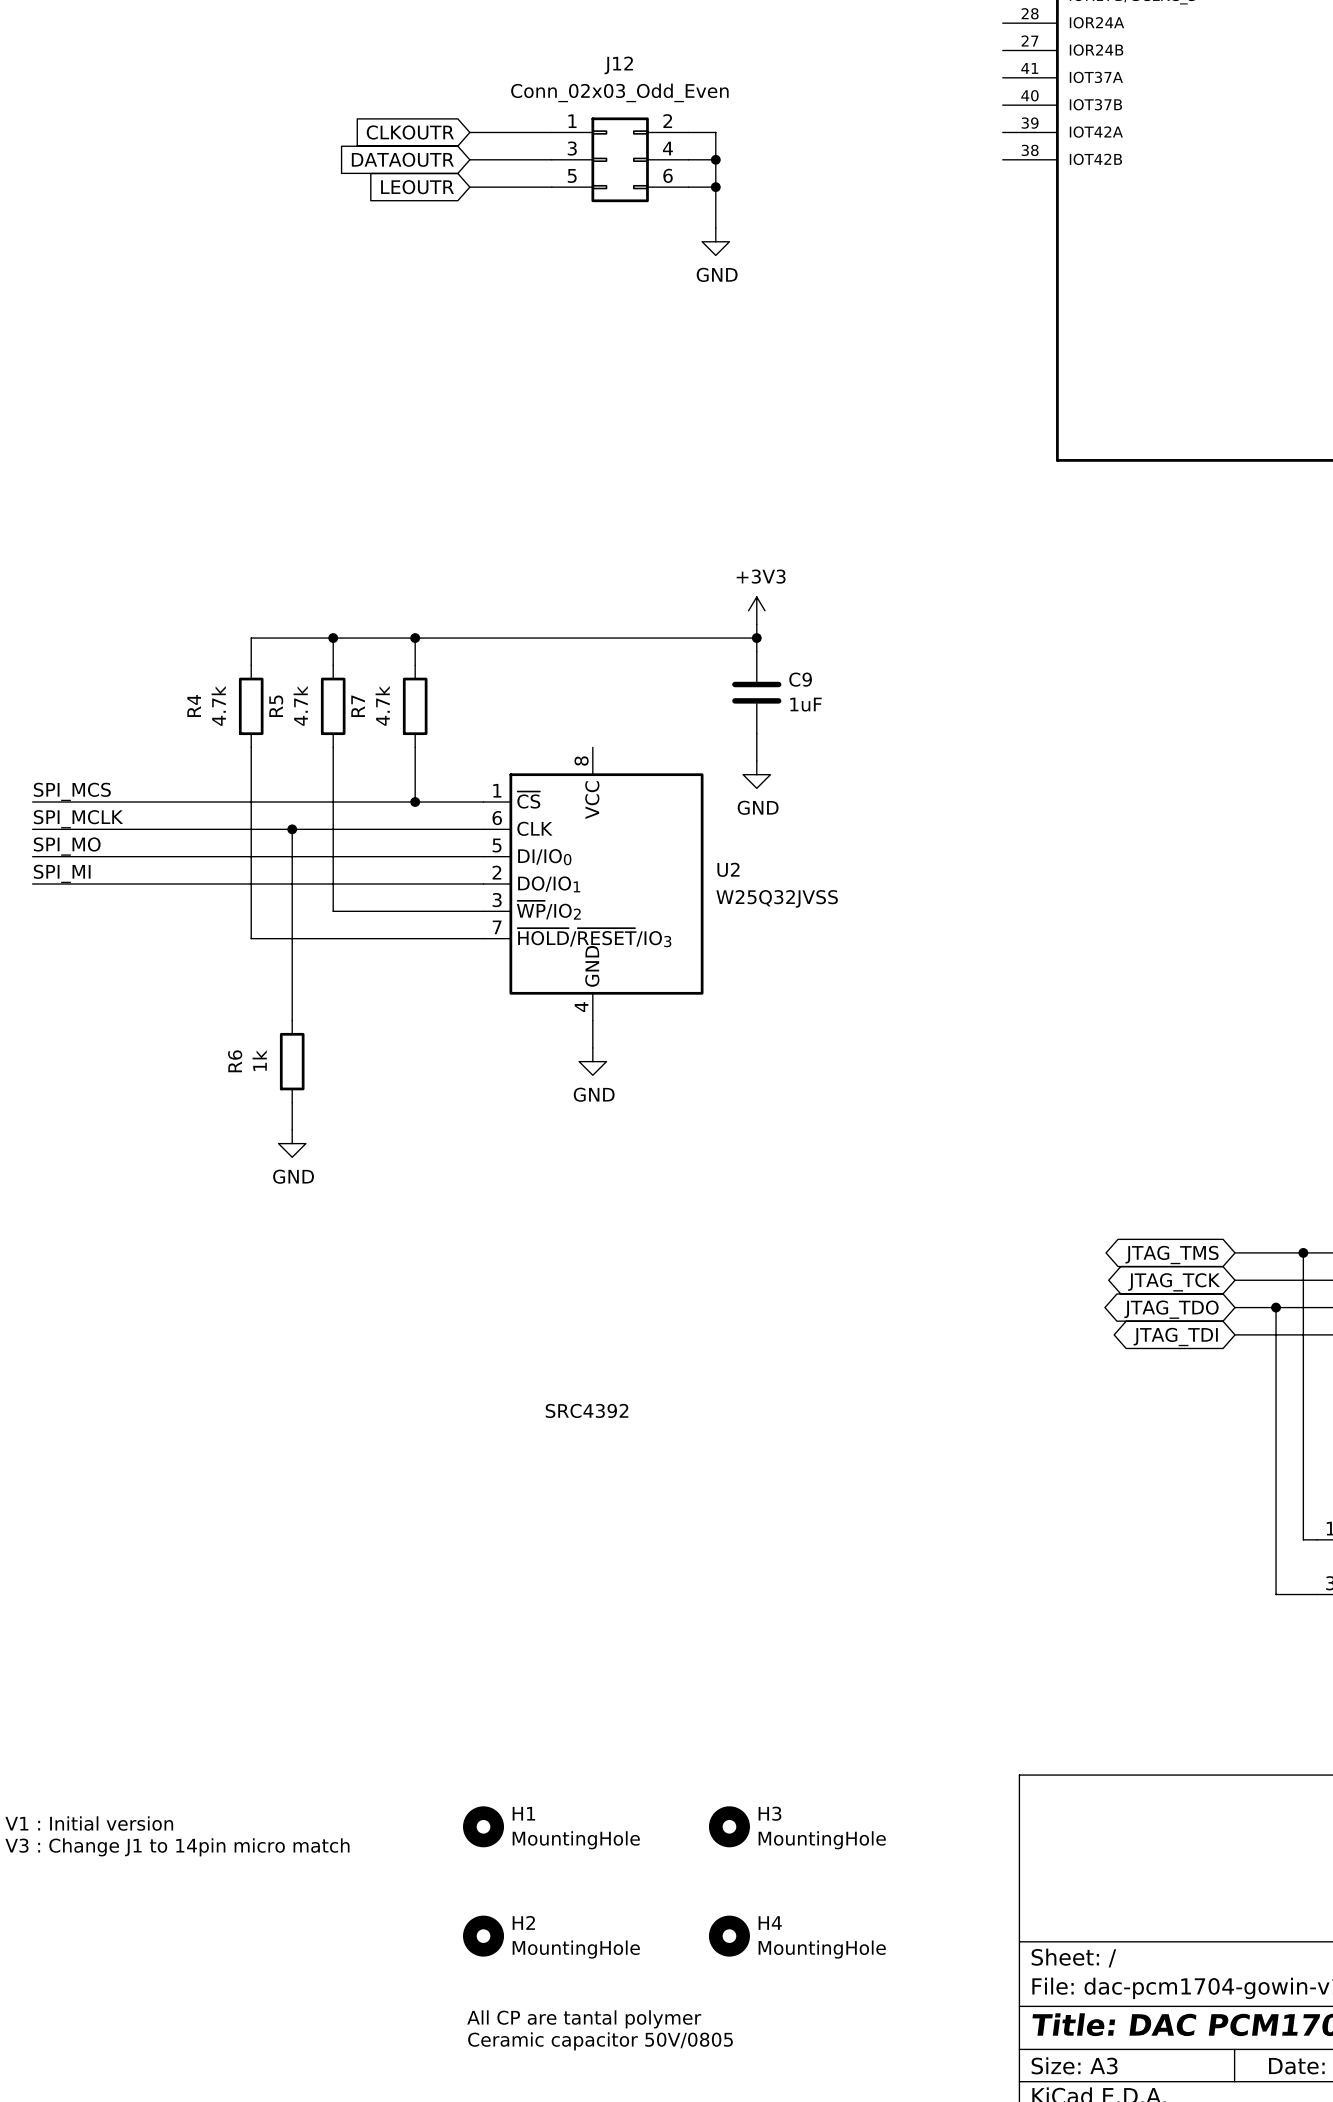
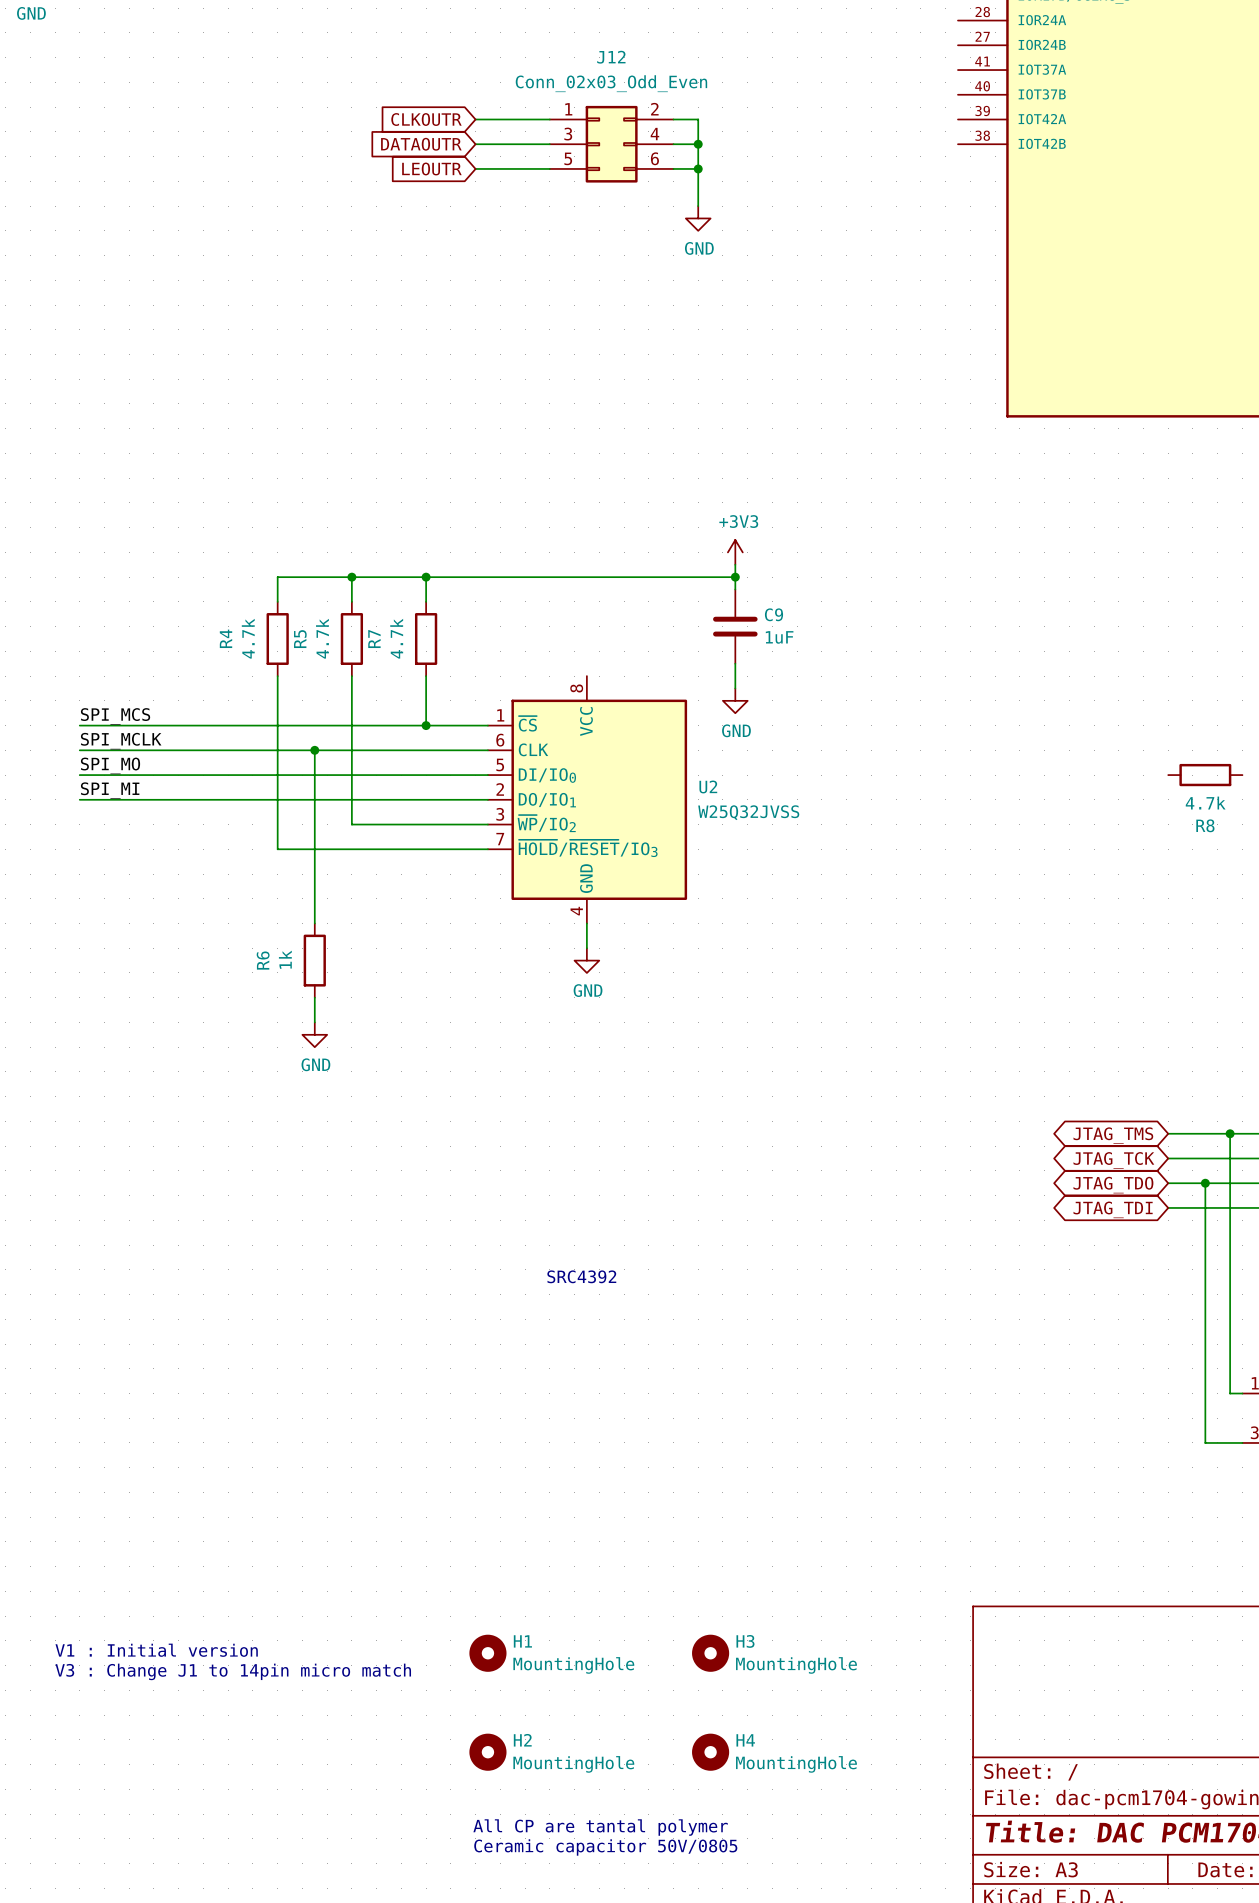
R8: none -> 4.7k (1205, 775)

